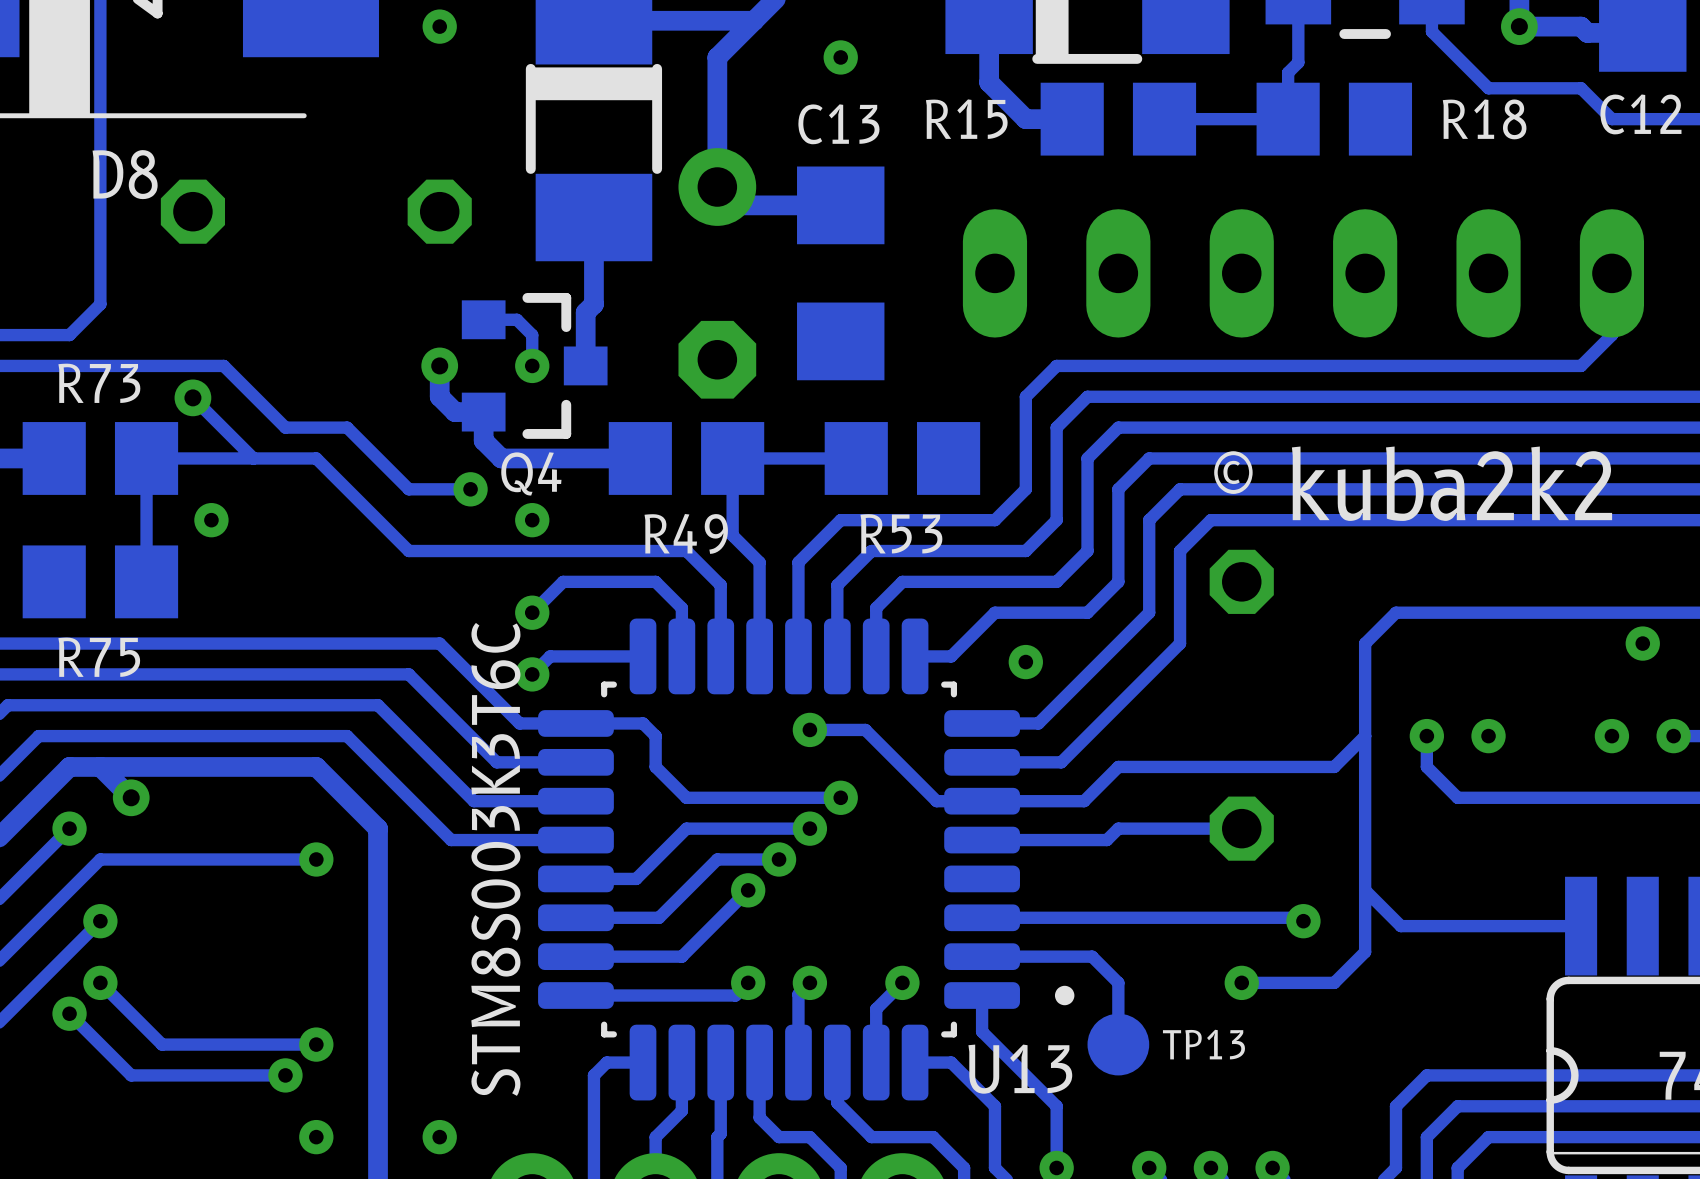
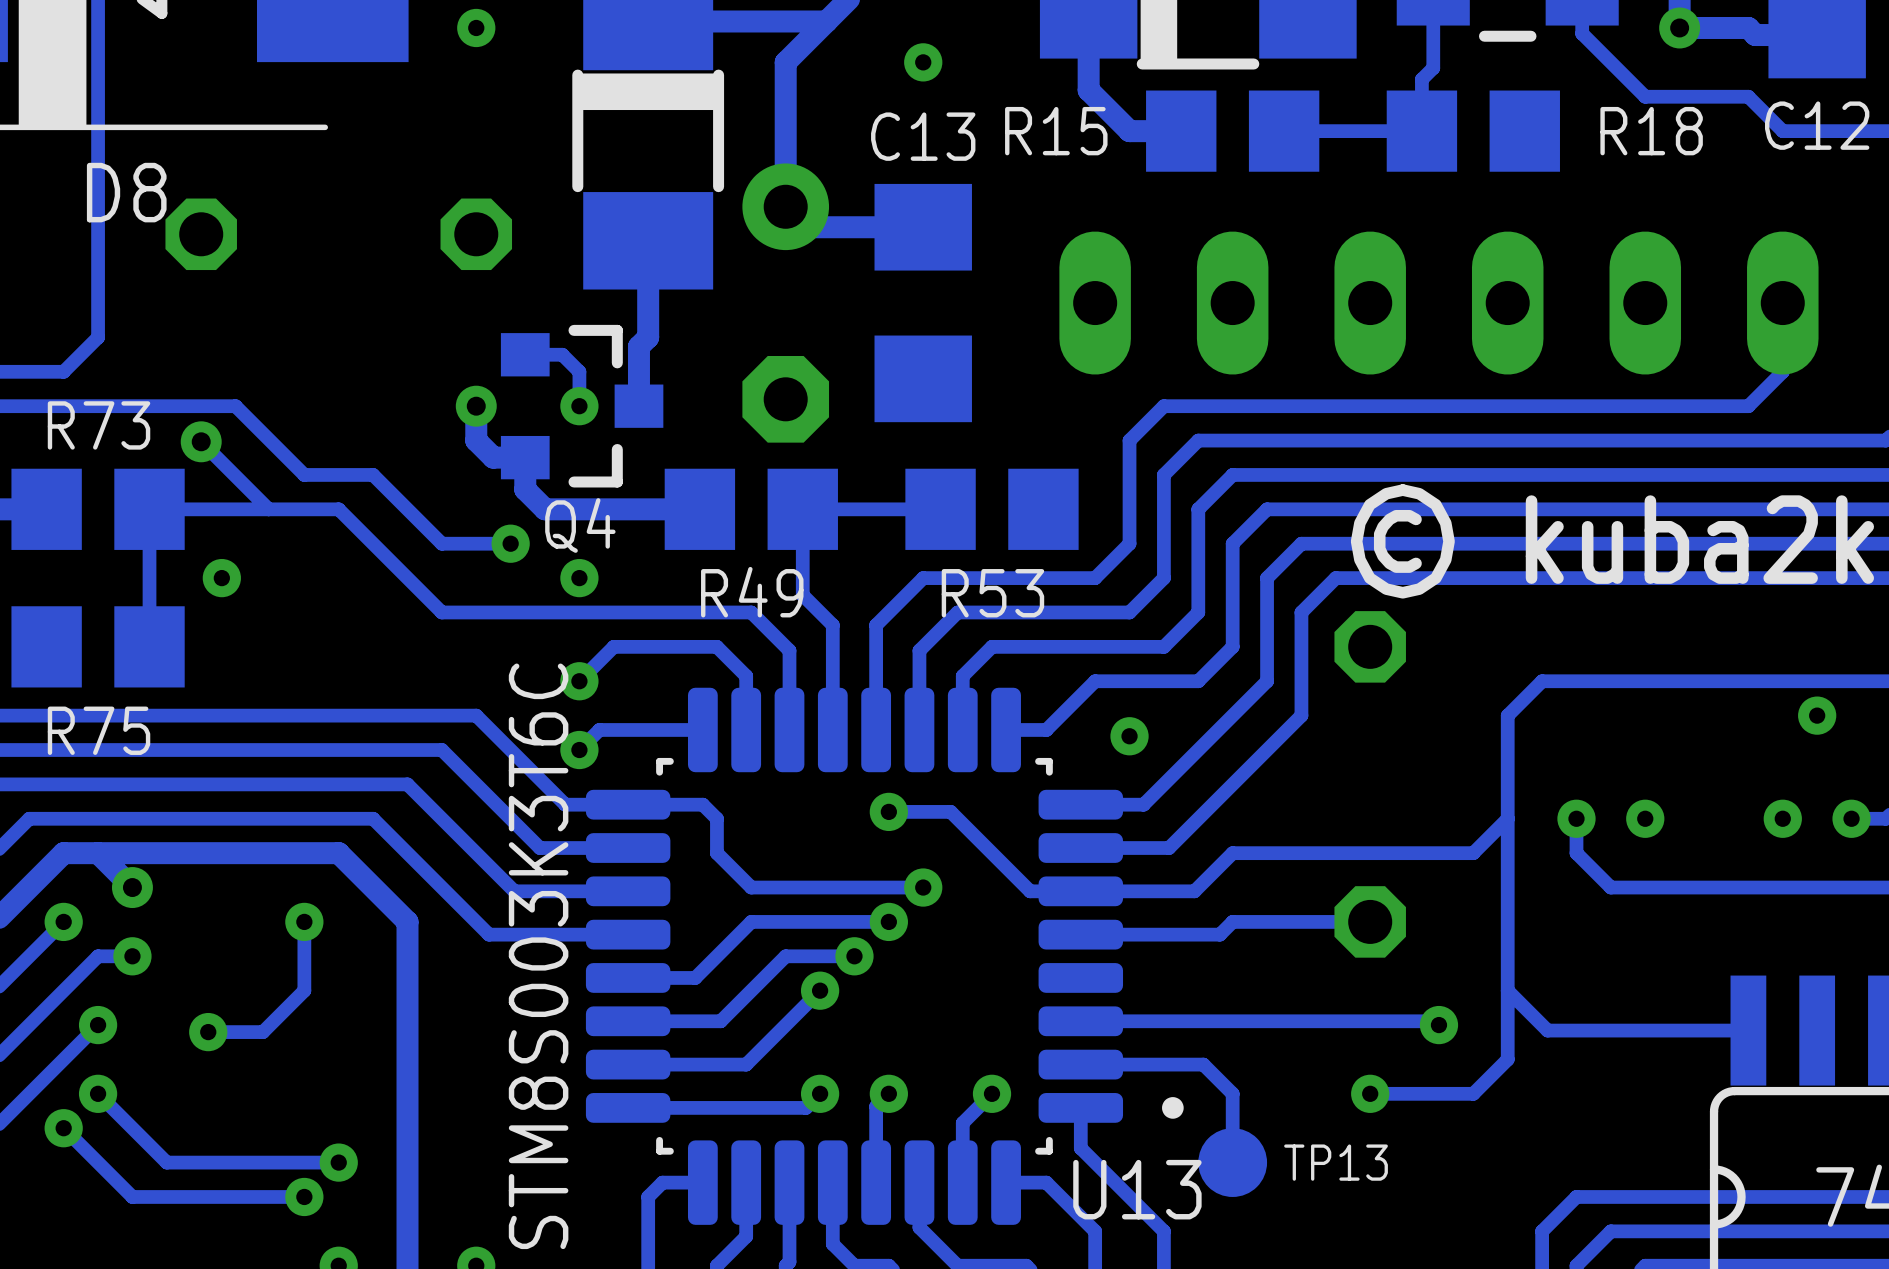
track: none -> (304, 921) (304, 990) (262, 1032) (208, 1032)
via: none -> (132, 956)
track: (316, 859) (131, 859) -> none
via position: (316, 859) -> (304, 921)
via: none -> (208, 1032)

